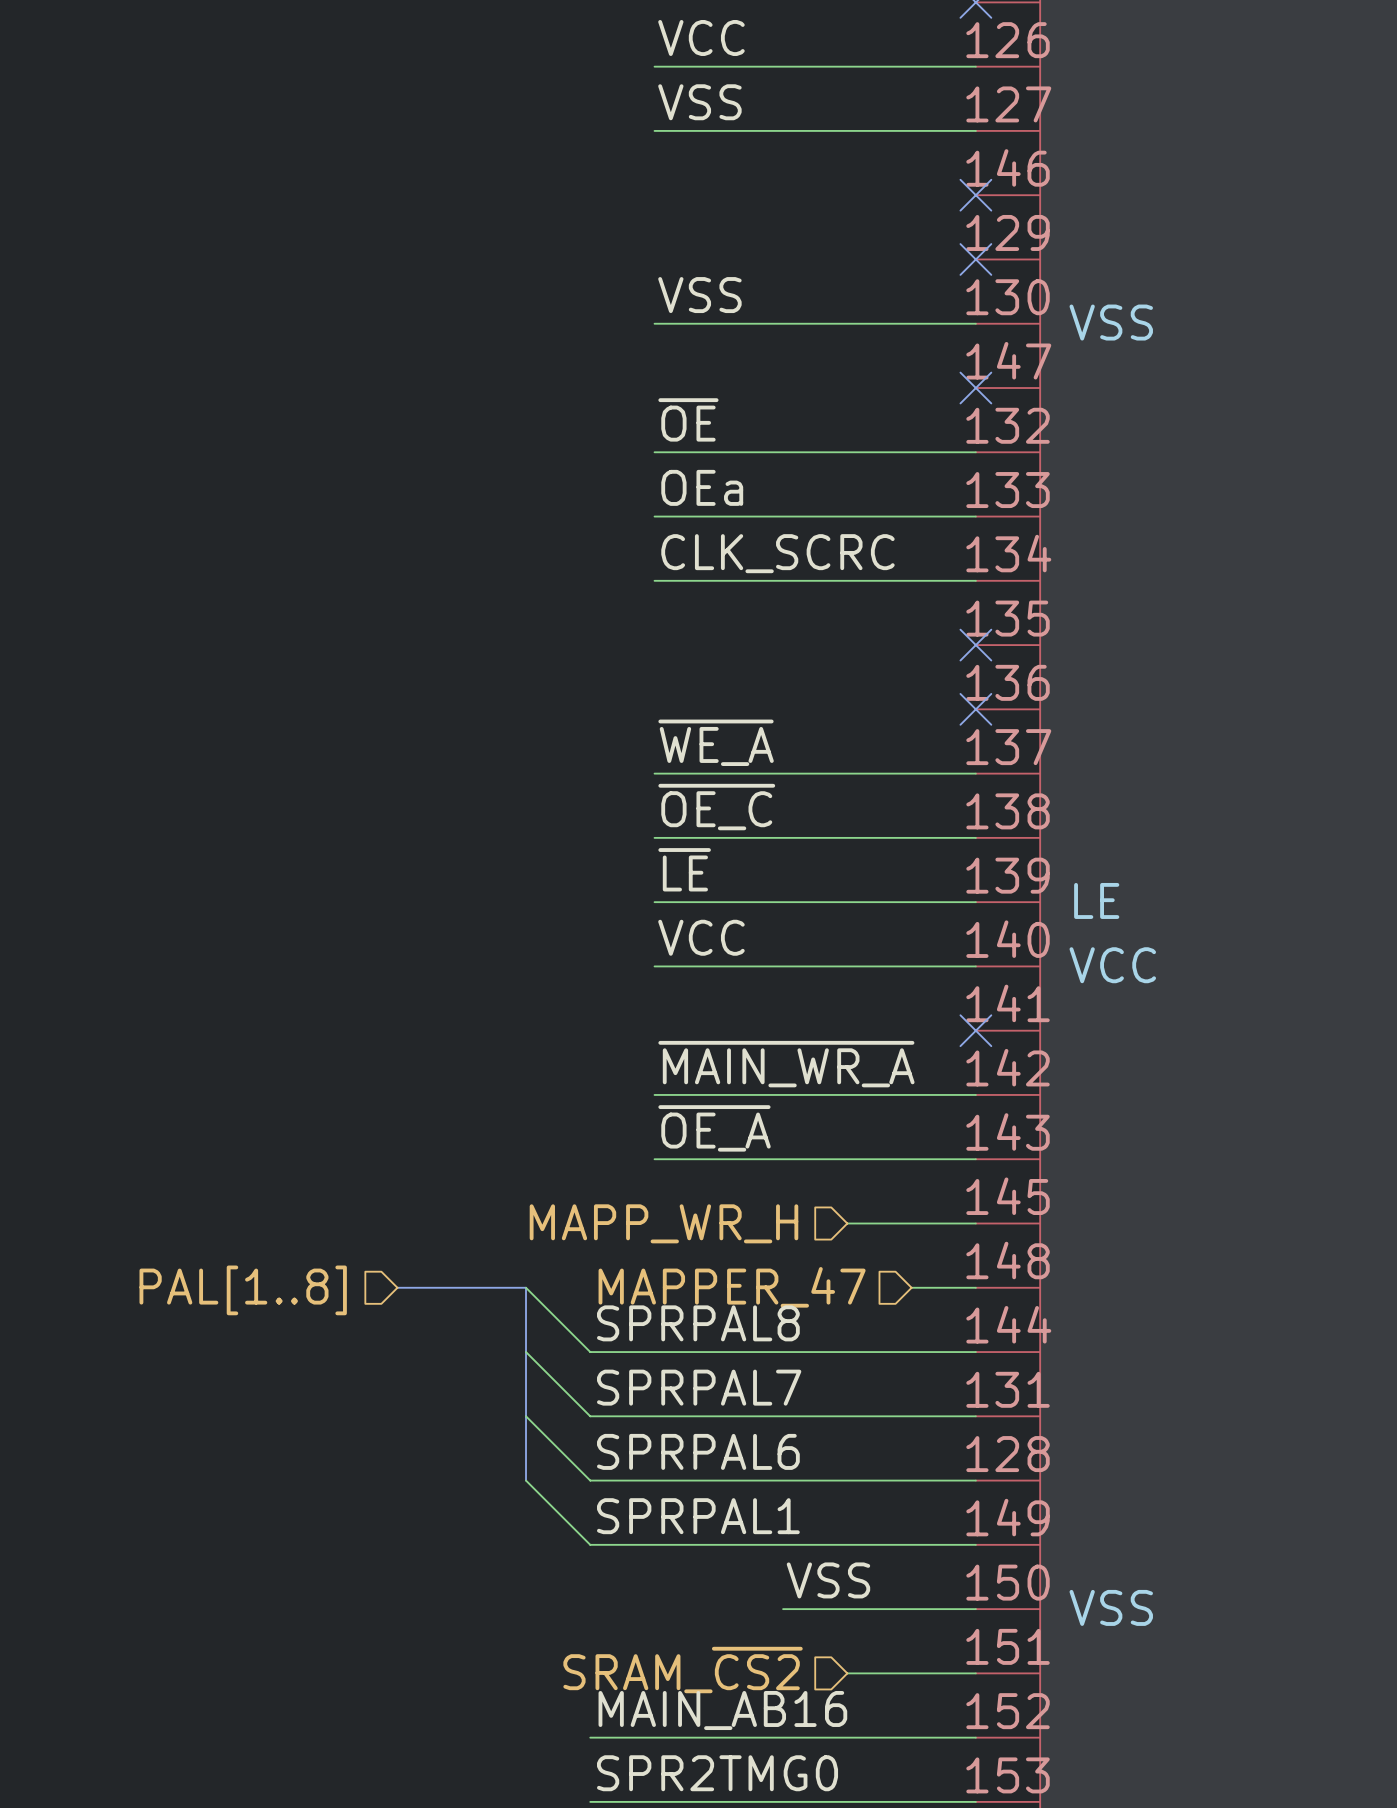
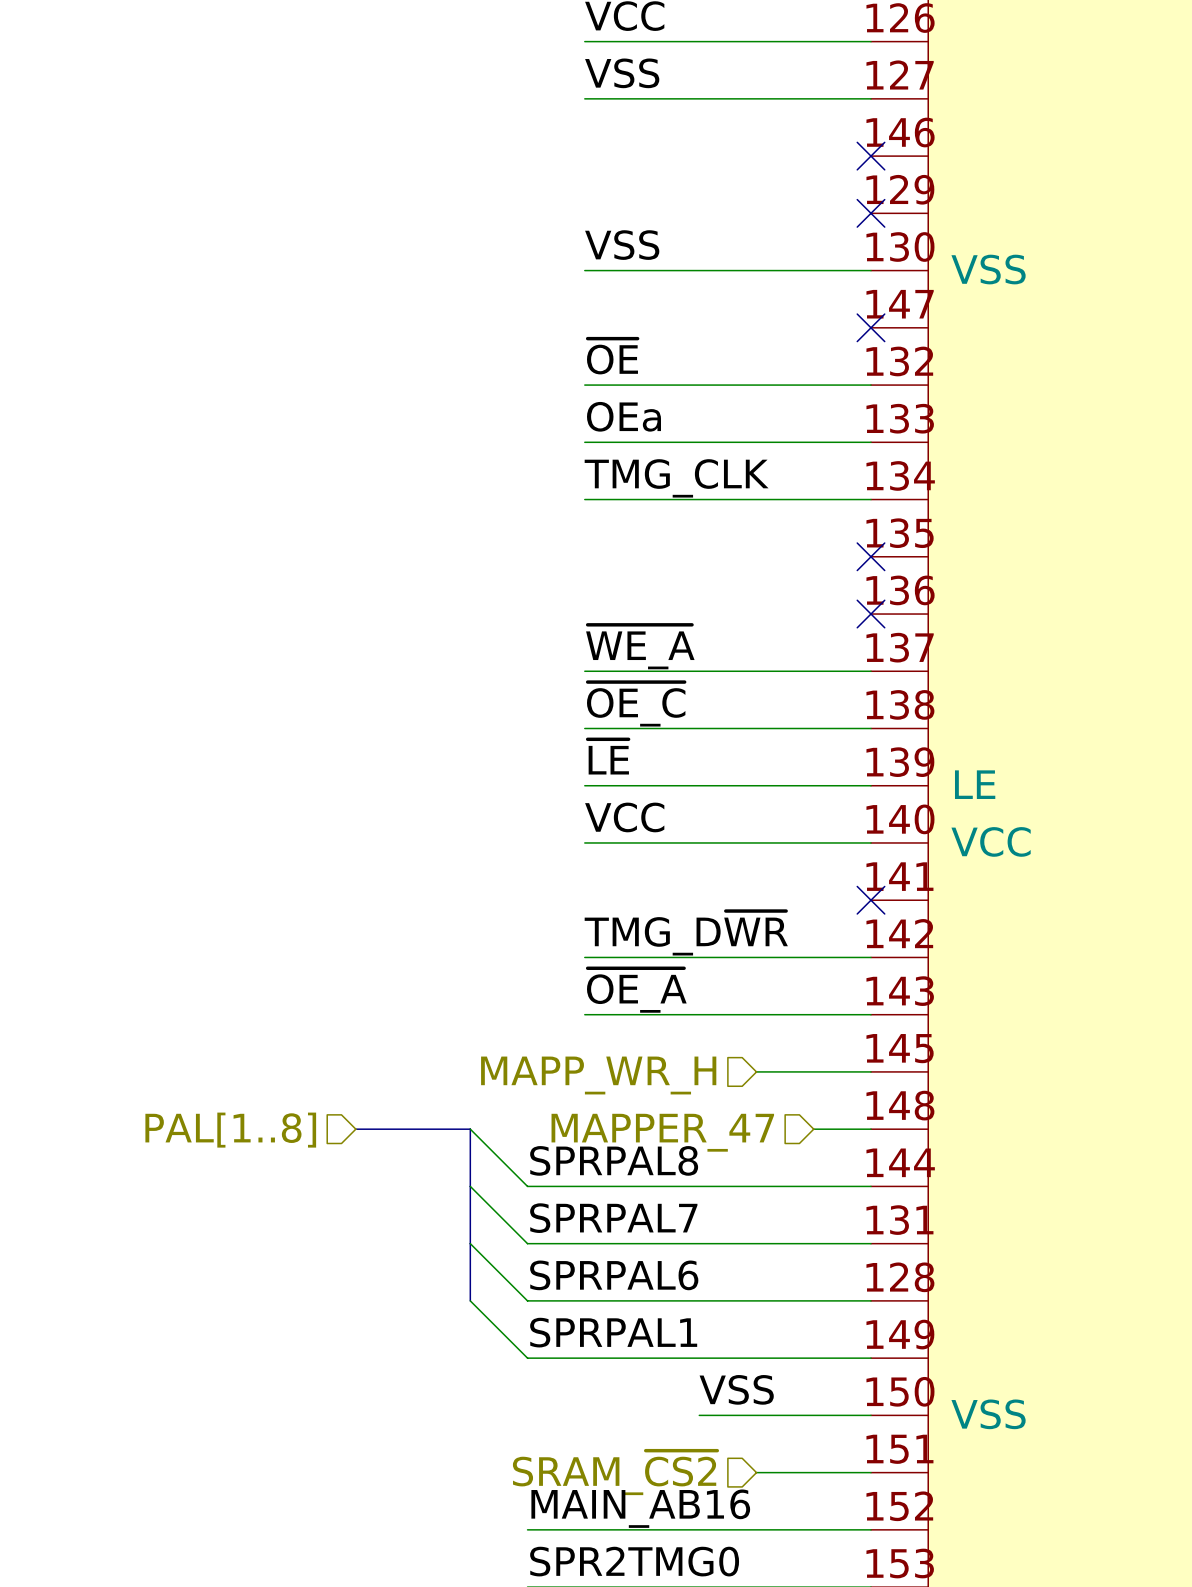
label: CLK_SCRC (777, 553) -> TMG_CLK (676, 478)
label: ~{MAIN_WR_A} (786, 1064) -> TMG_D~{WR} (686, 933)

